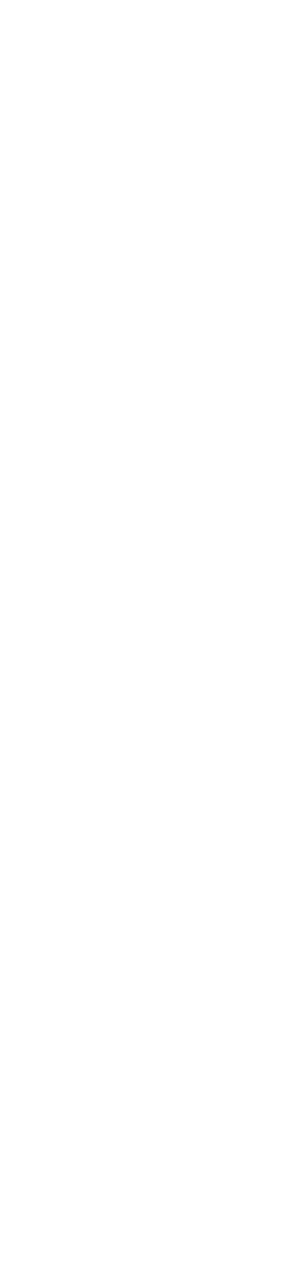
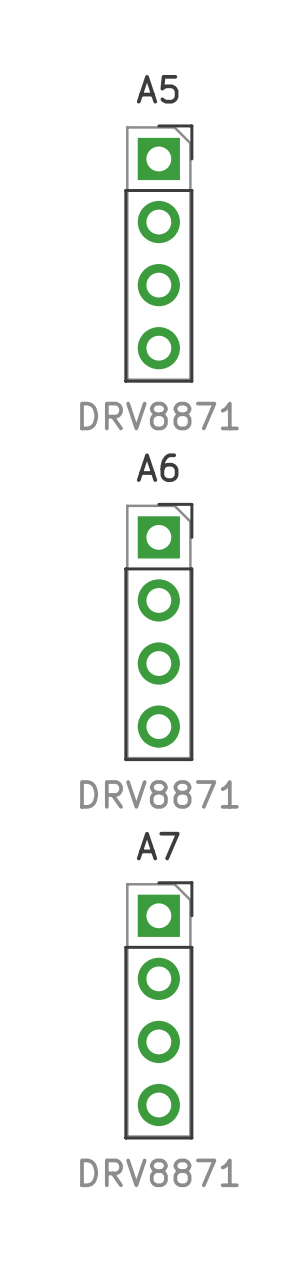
A5: none -> DRV8871 (158, 253)
A6: none -> DRV8871 (158, 631)
A7: none -> DRV8871 (158, 1010)

